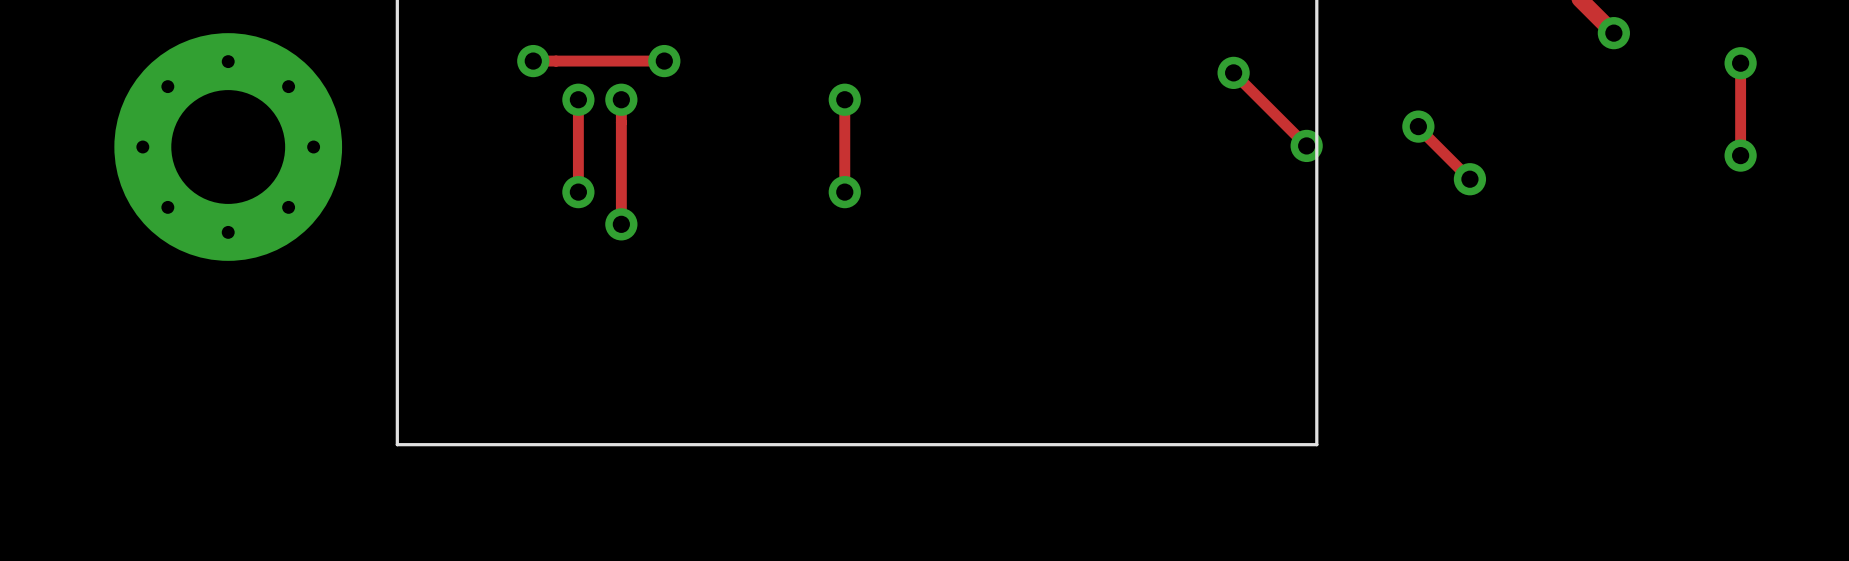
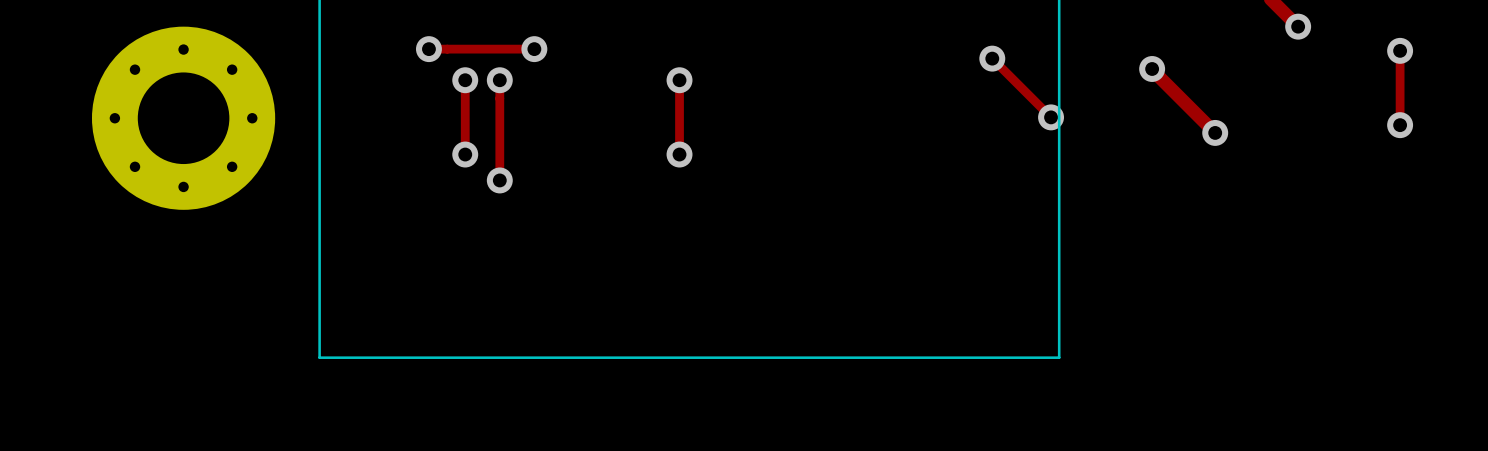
track: none -> (1152, 68) (1215, 132)
track: (1418, 126) (1469, 179) -> none
via position: (1418, 126) -> (1152, 68)
via position: (1469, 179) -> (1215, 132)

